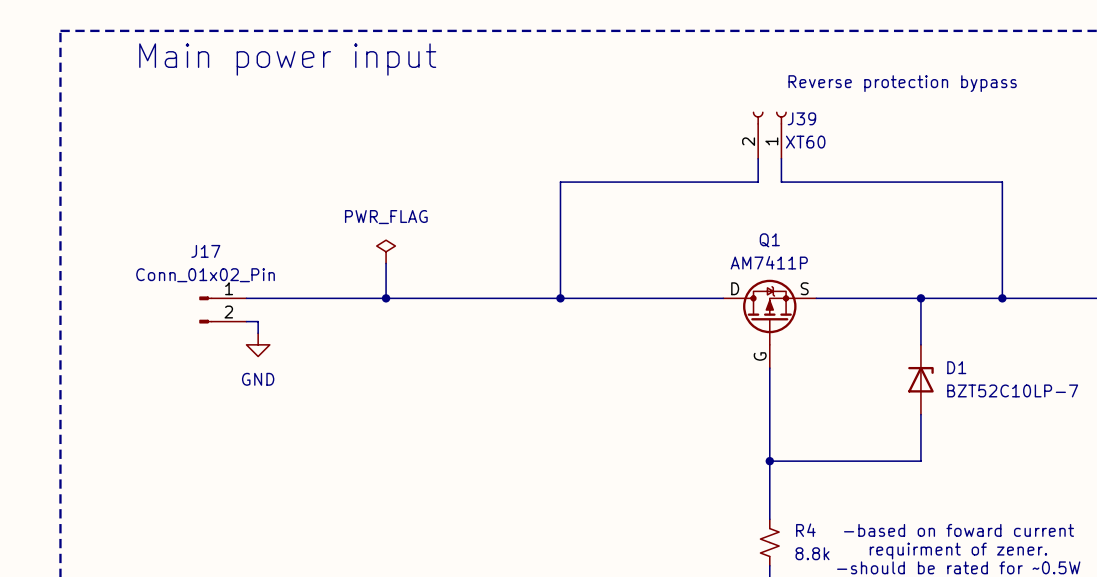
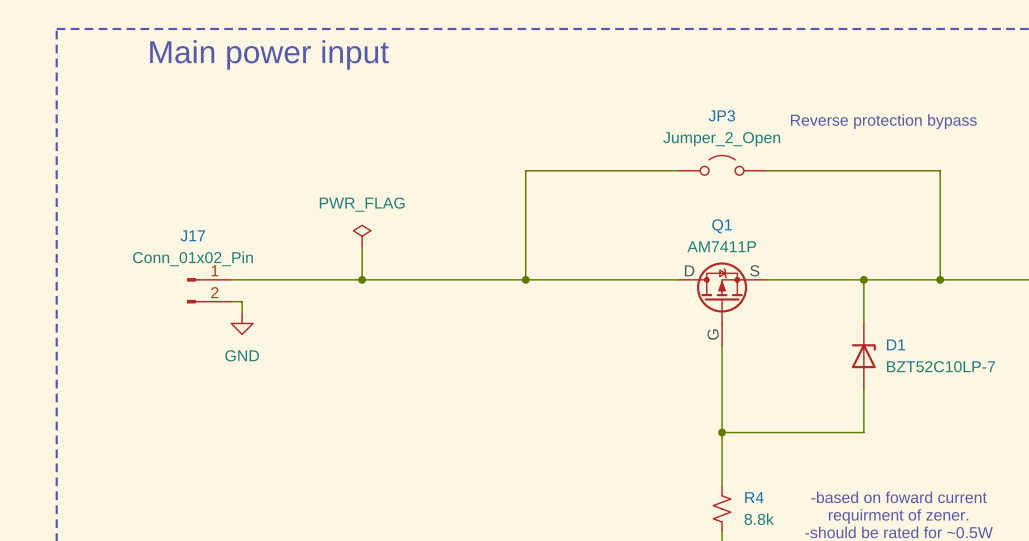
text position: Reverse protection bypass (902, 83) -> Reverse protection bypass (883, 121)
J39: XT60 (769, 135) -> none
wire: (758, 158) (758, 182) (723, 182) -> none
wire: (781, 158) (781, 182) (816, 182) -> none
JP3: none -> Jumper_2_Open (722, 165)

